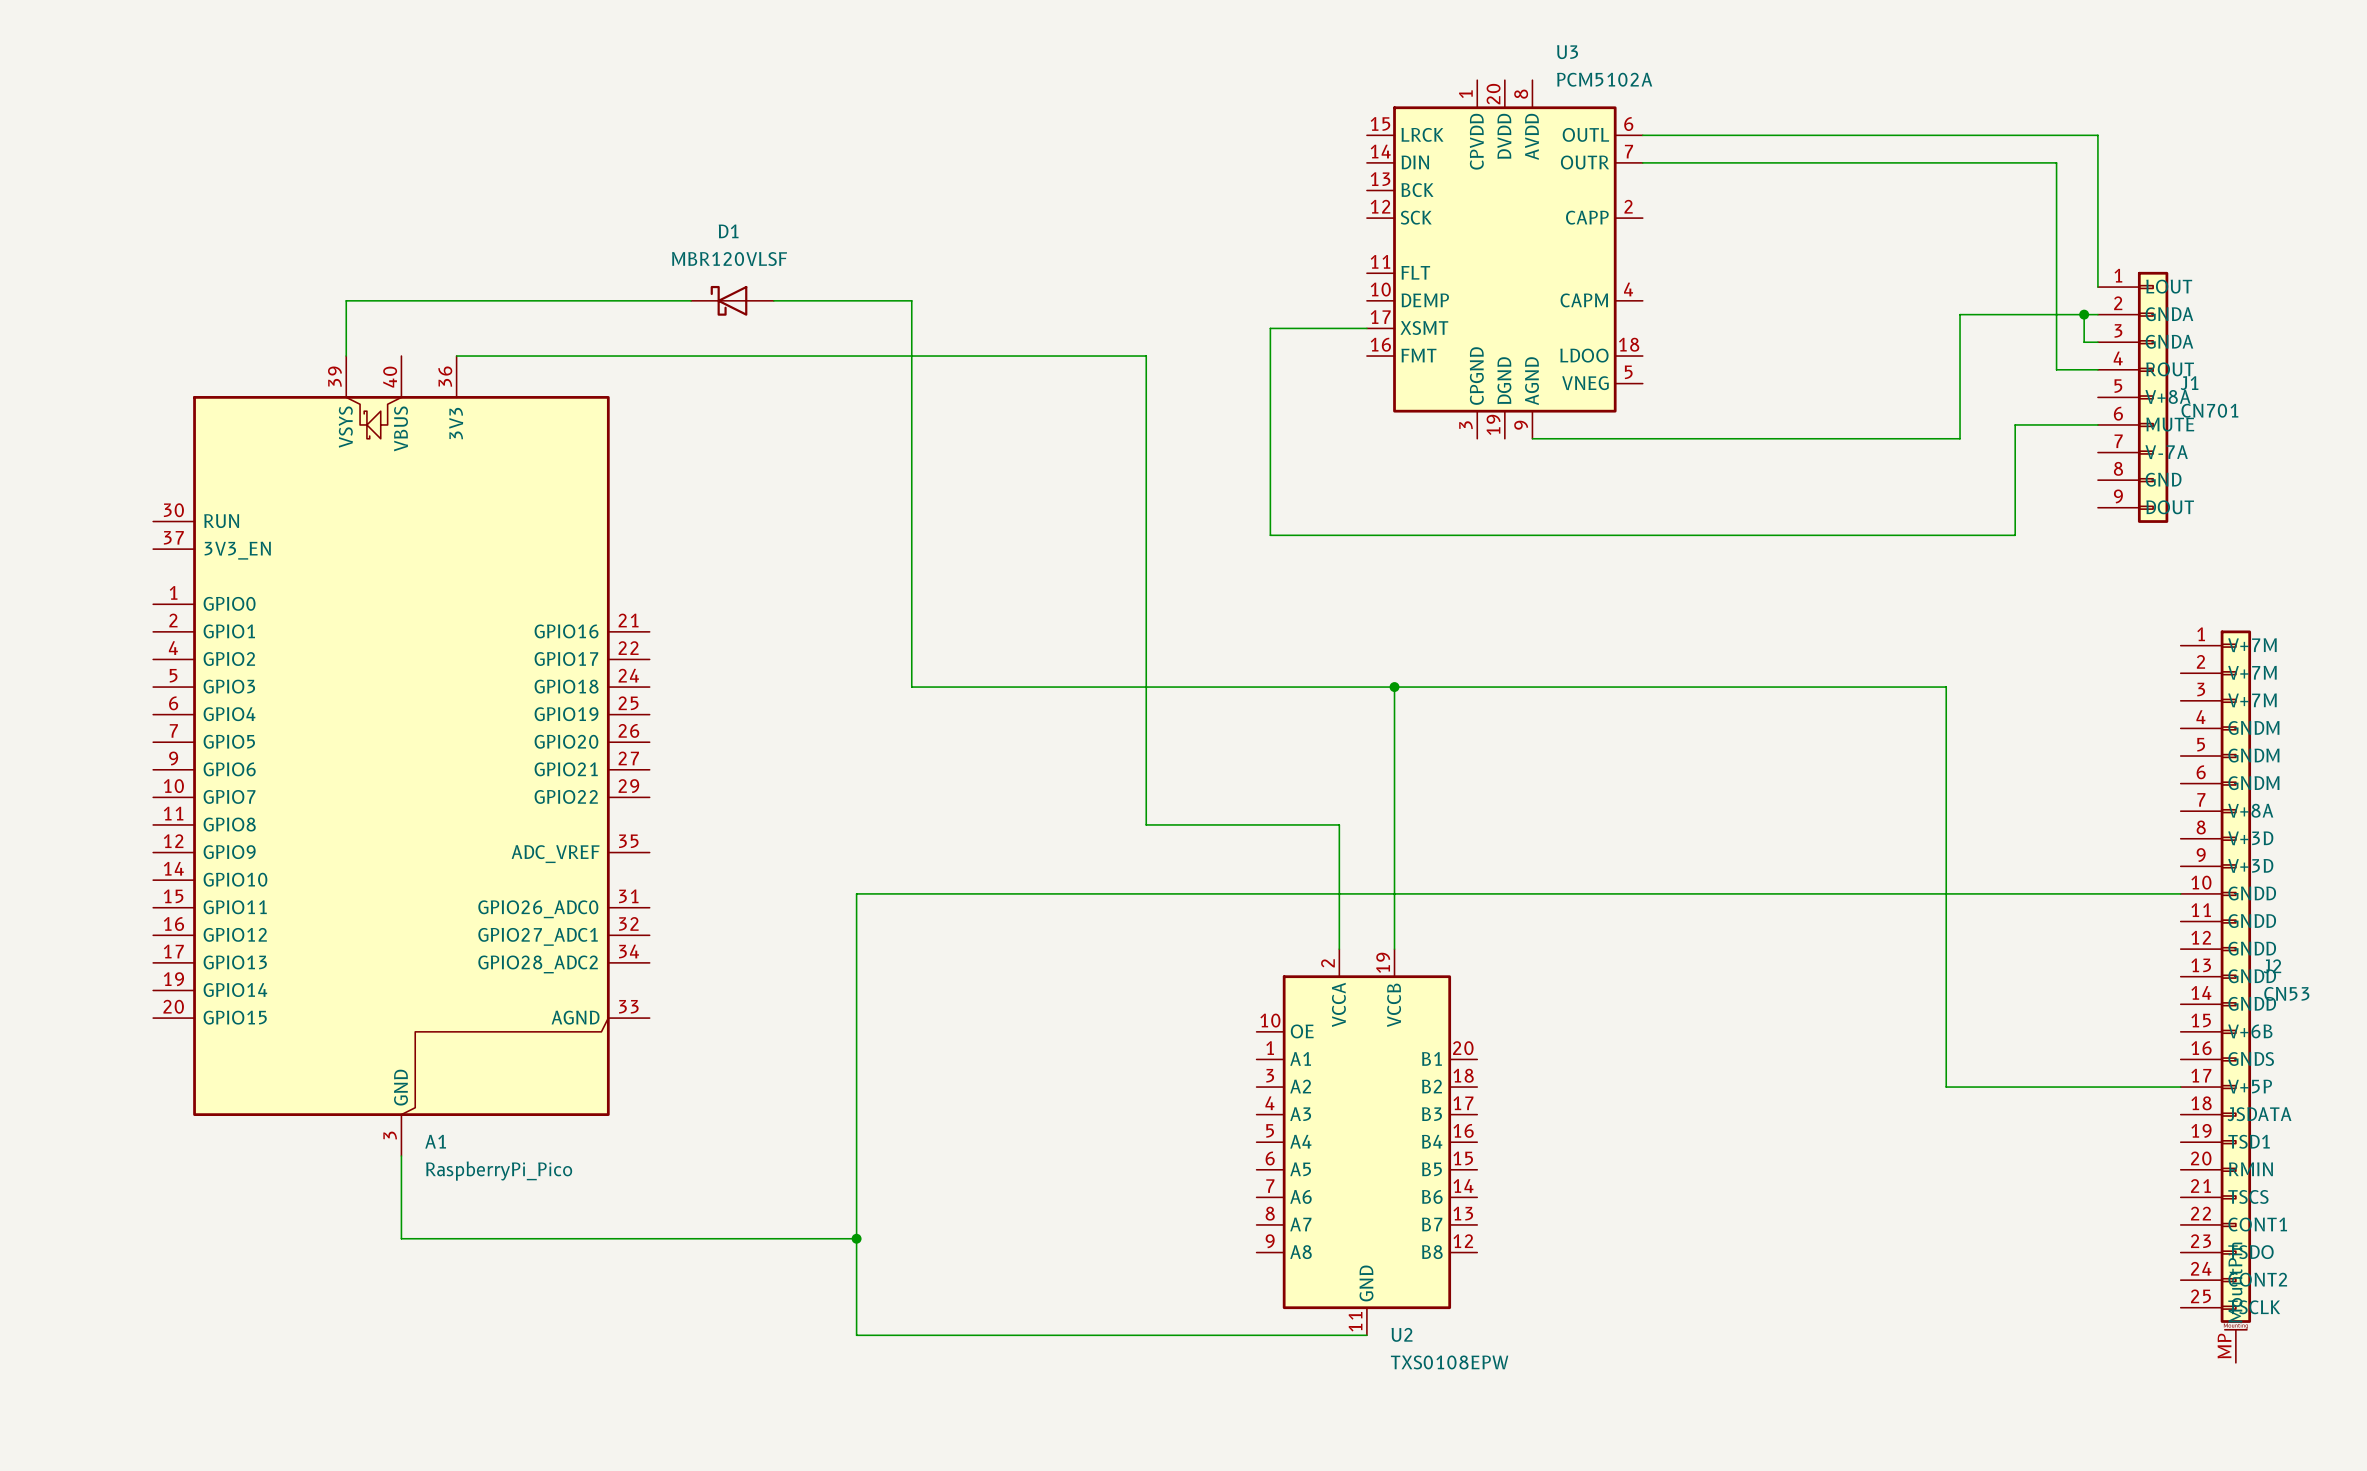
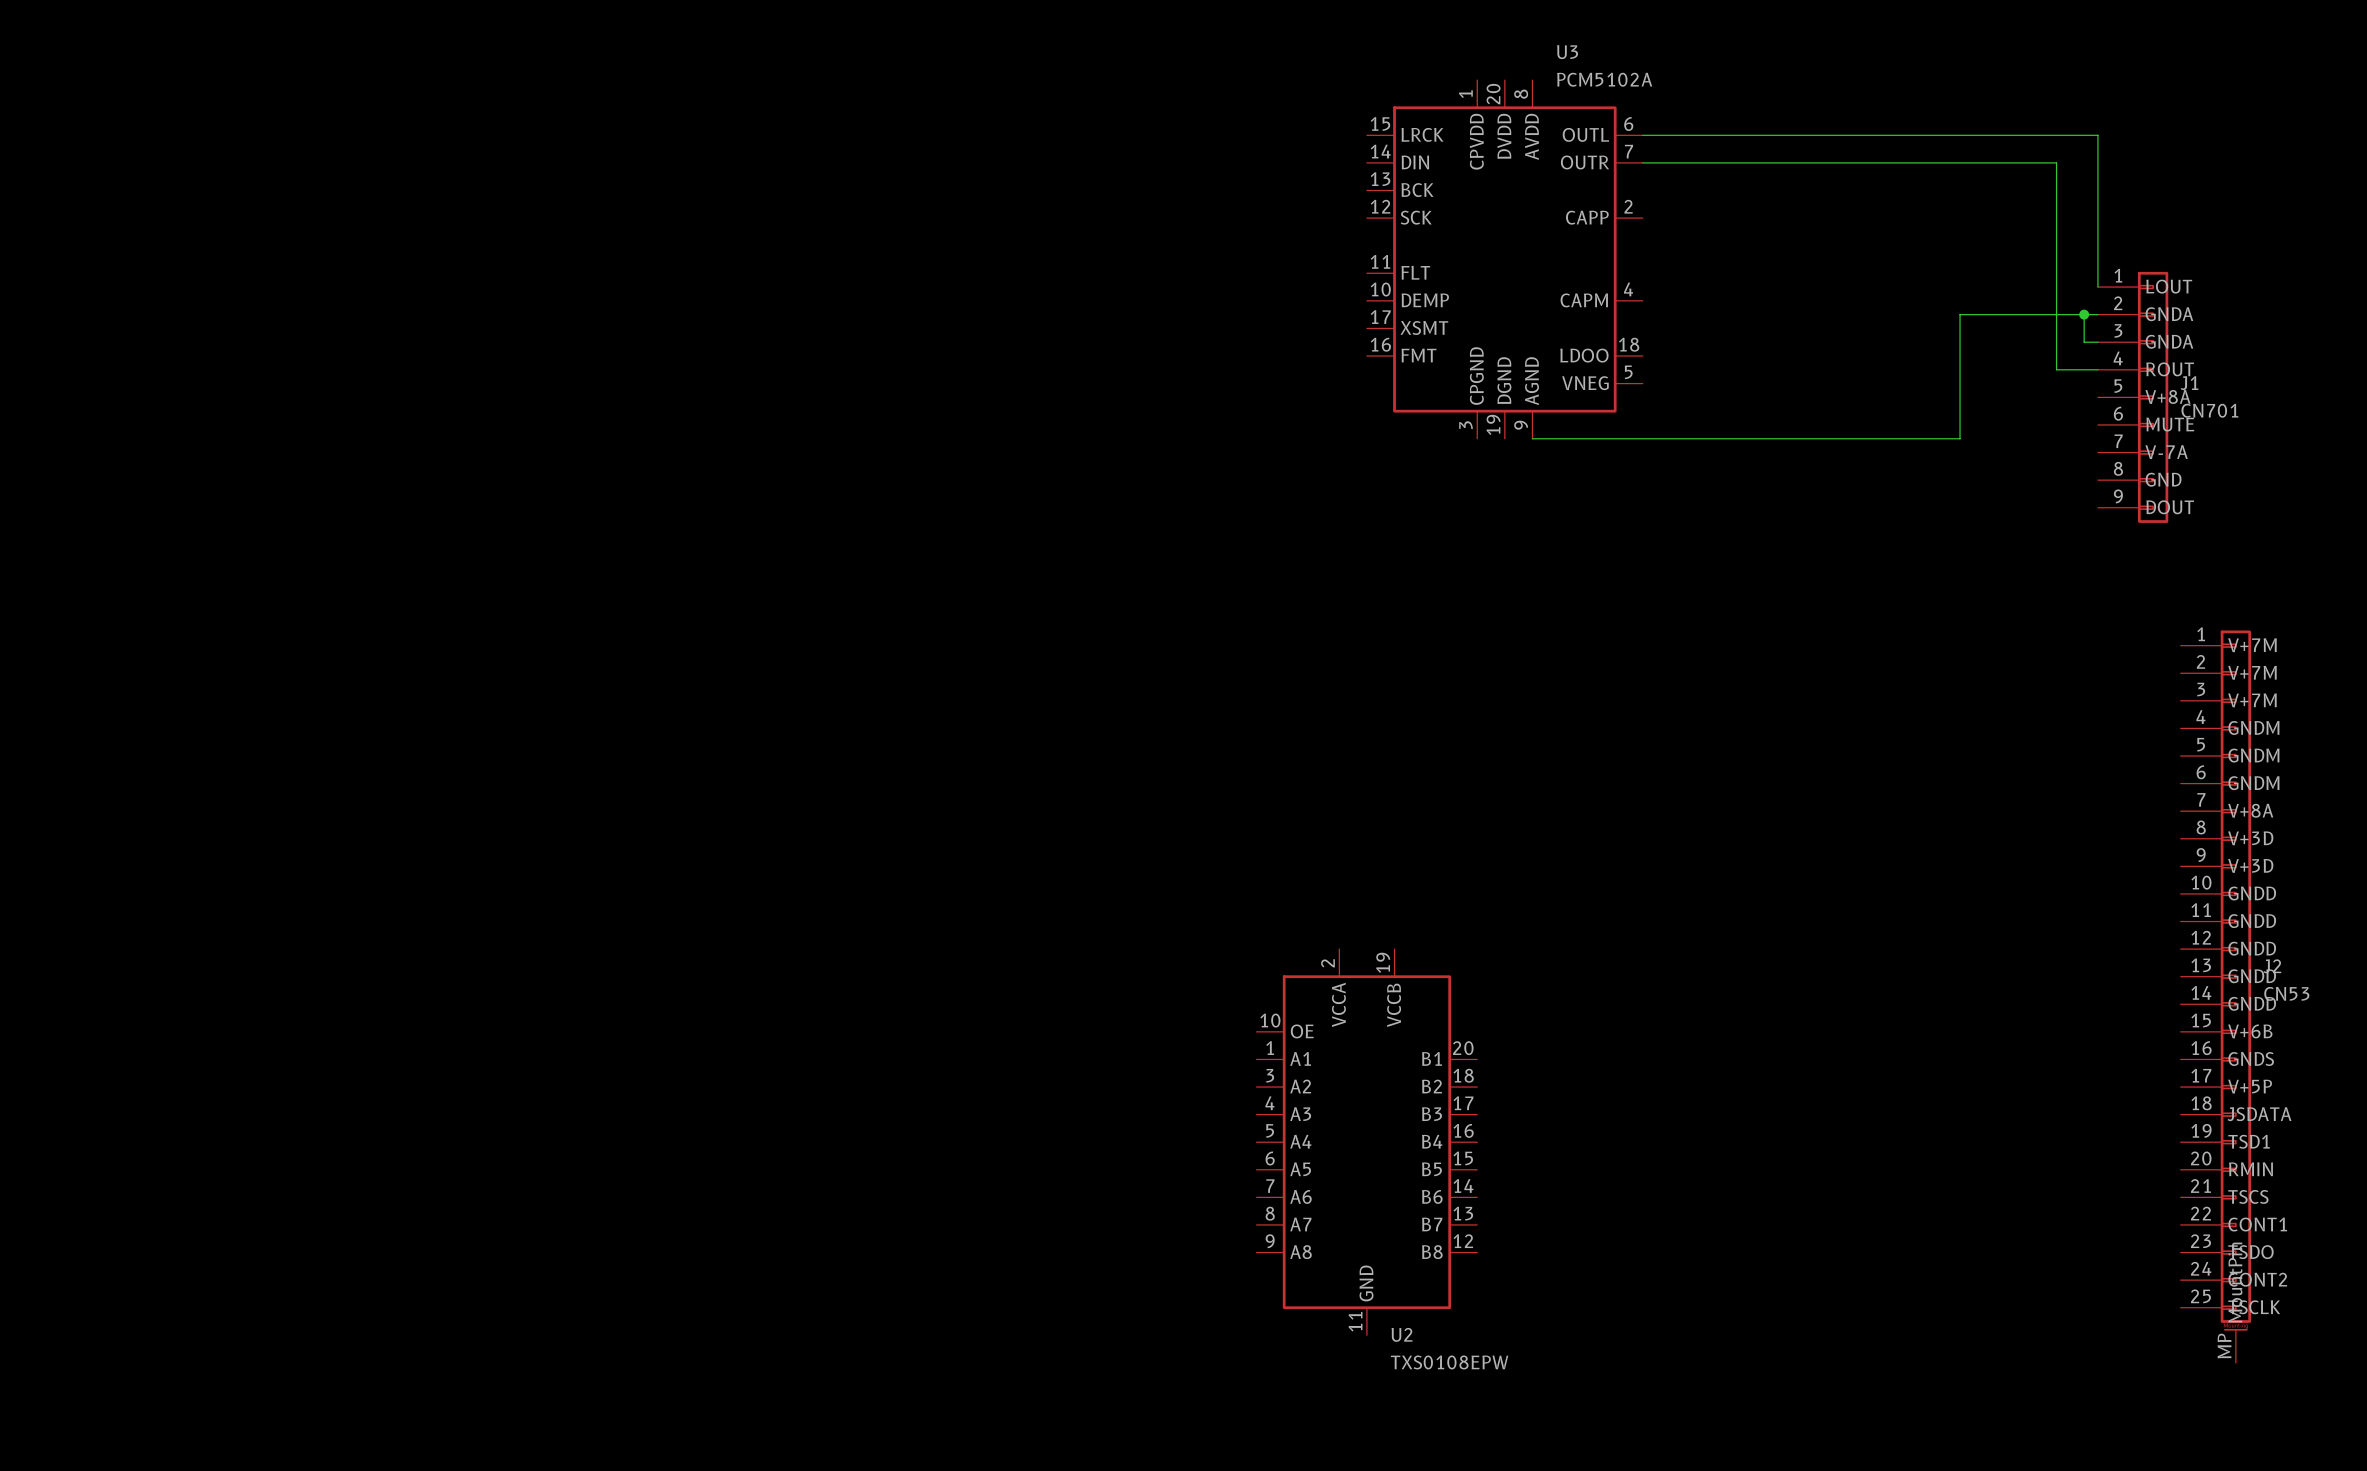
wire: (691, 300) (346, 300) (346, 356) -> none
D1: MBR120VLSF (732, 300) -> none
wire: (773, 300) (911, 300) (911, 687) (1946, 687) (1946, 1087) (2180, 1087) -> none
wire: (1366, 328) (1270, 328) (1270, 535) (2015, 535) (2015, 424) (2097, 424) -> none
wire: (456, 356) (1146, 356) (1146, 824) (1339, 824) (1339, 949) -> none
wire: (1394, 687) (1394, 949) -> none
junction: (1394, 687) -> none
A1: RaspberryPi_Pico (401, 756) -> none
wire: (2180, 893) (856, 893) (856, 1335) (1366, 1335) -> none
wire: (401, 1155) (401, 1238) (856, 1238) -> none
junction: (856, 1238) -> none

